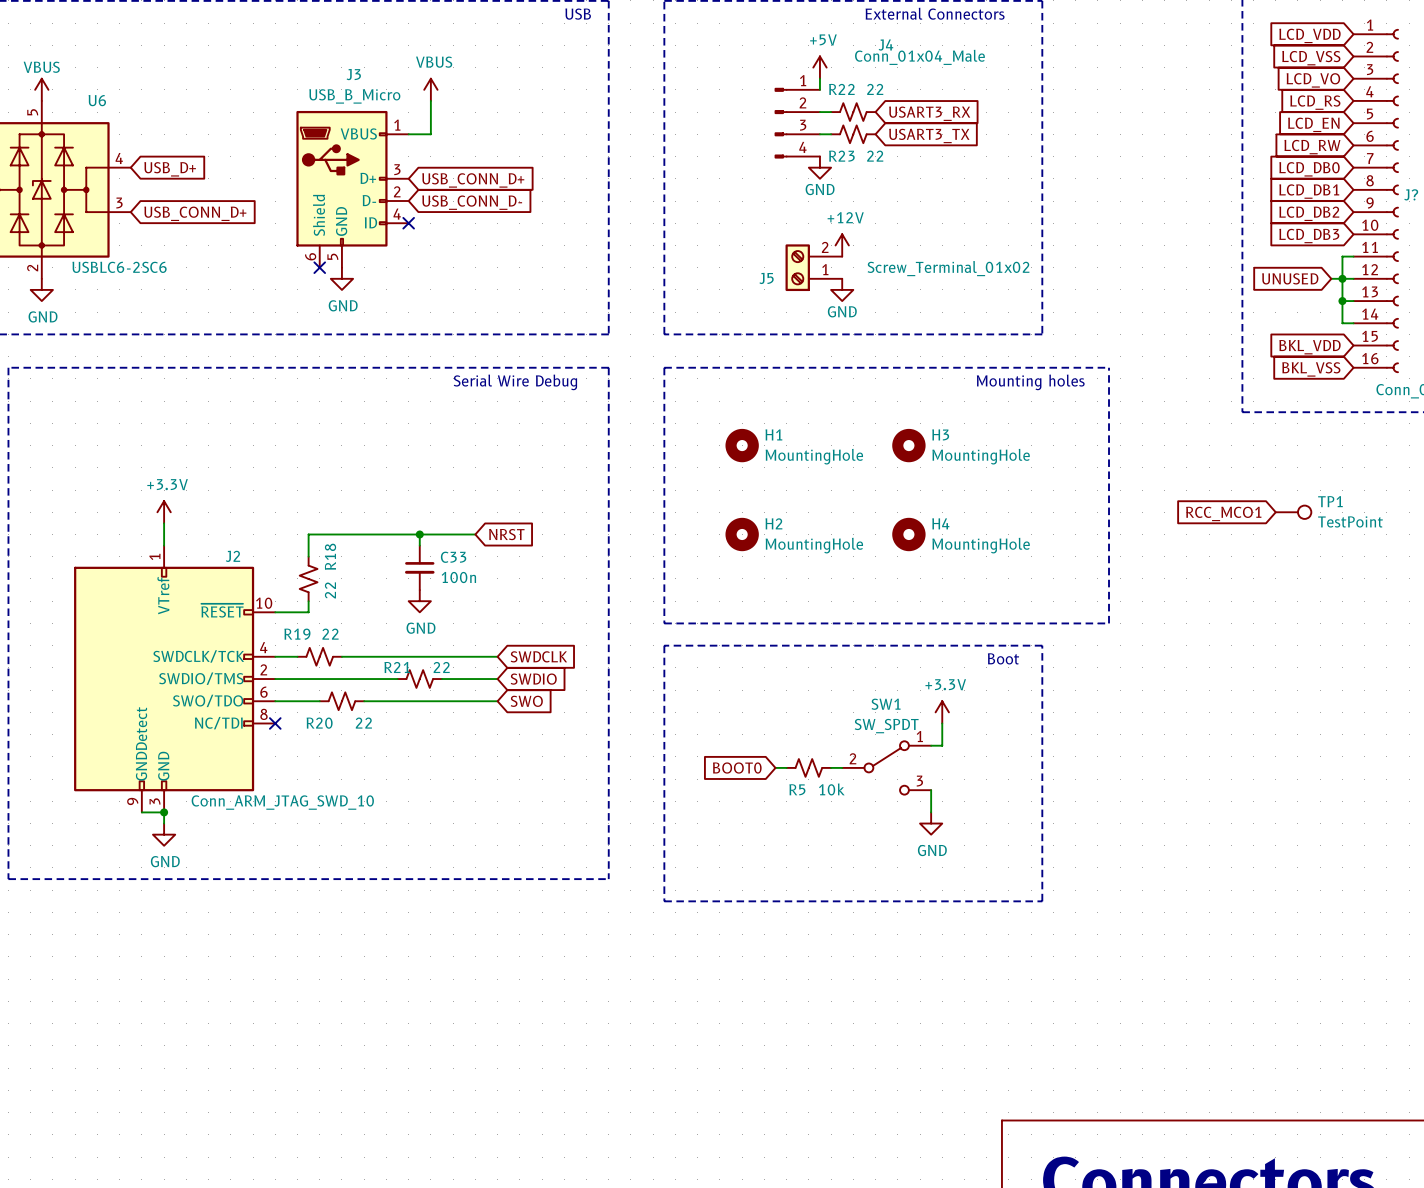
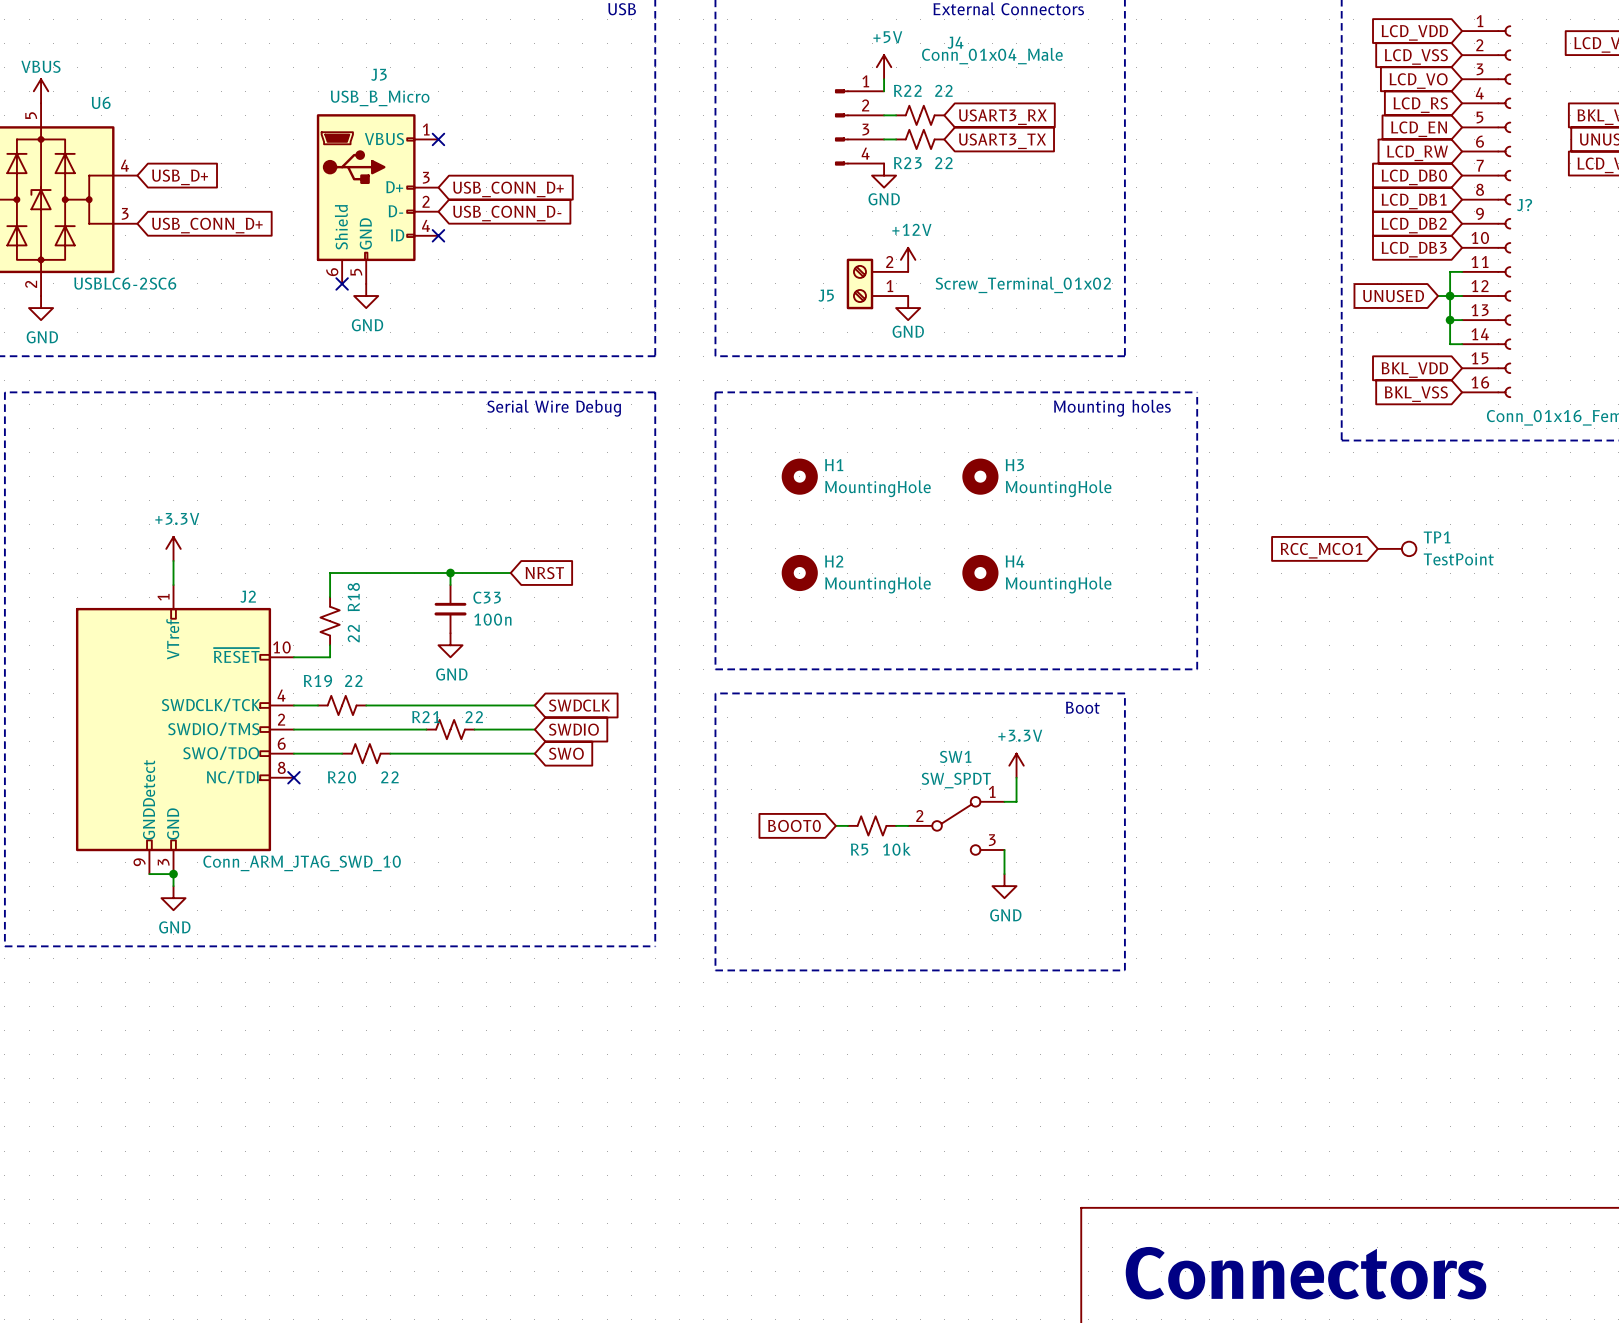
power symbol: VBUS (430, 89) -> none
wire: (430, 100) (430, 134) (408, 134) -> none
no-connect mark: none -> (438, 139)

